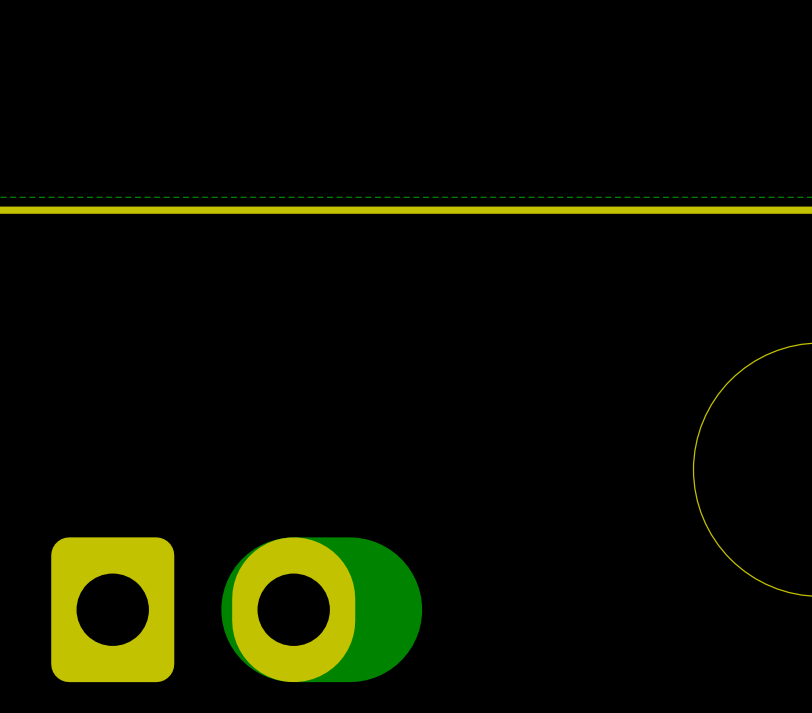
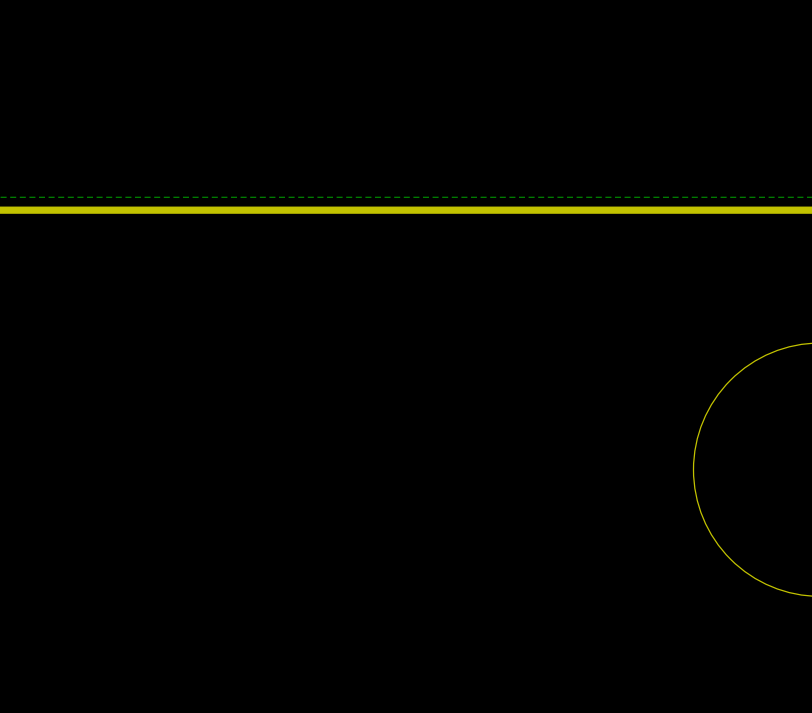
part: (203, 609) -> none
track: (349, 609) (293, 609) -> none

